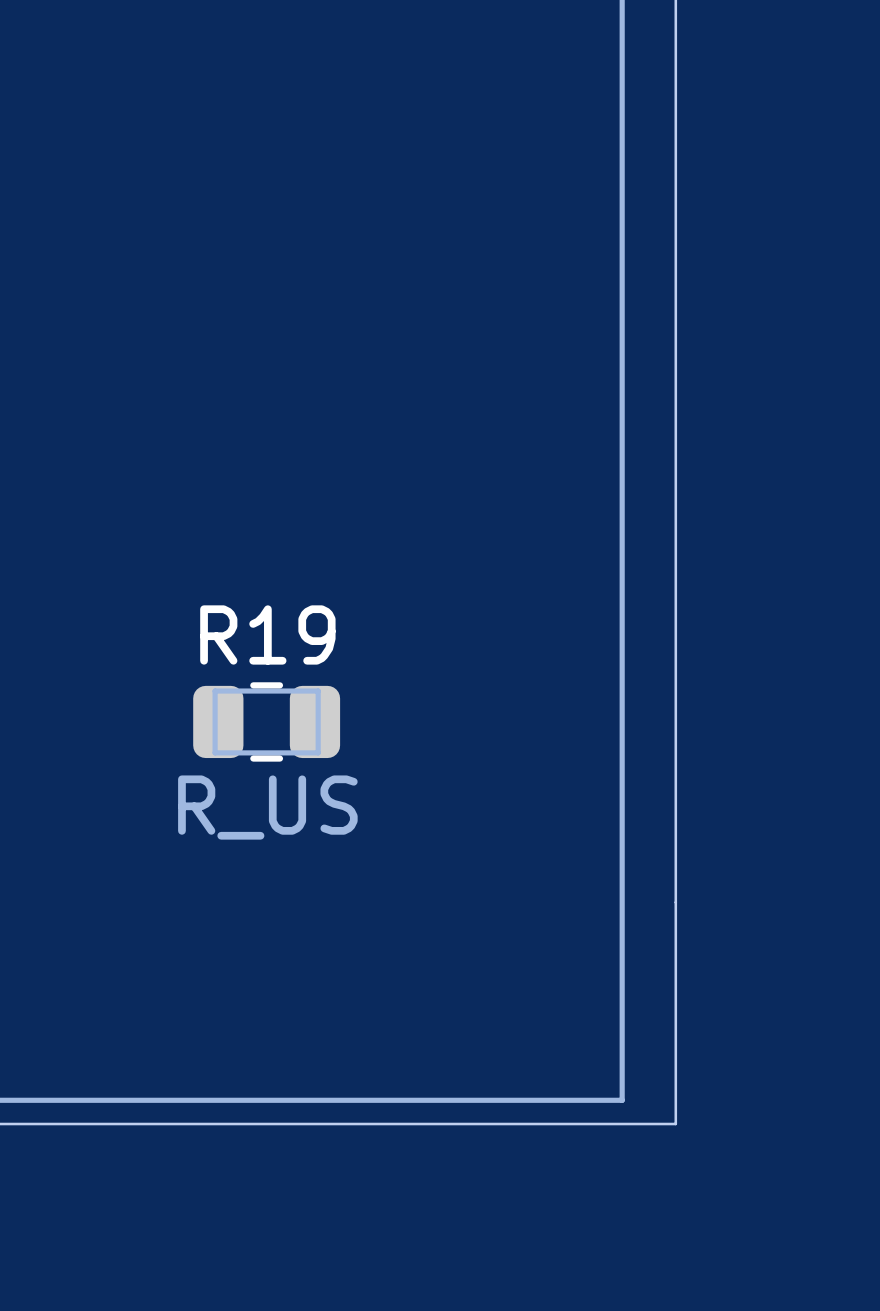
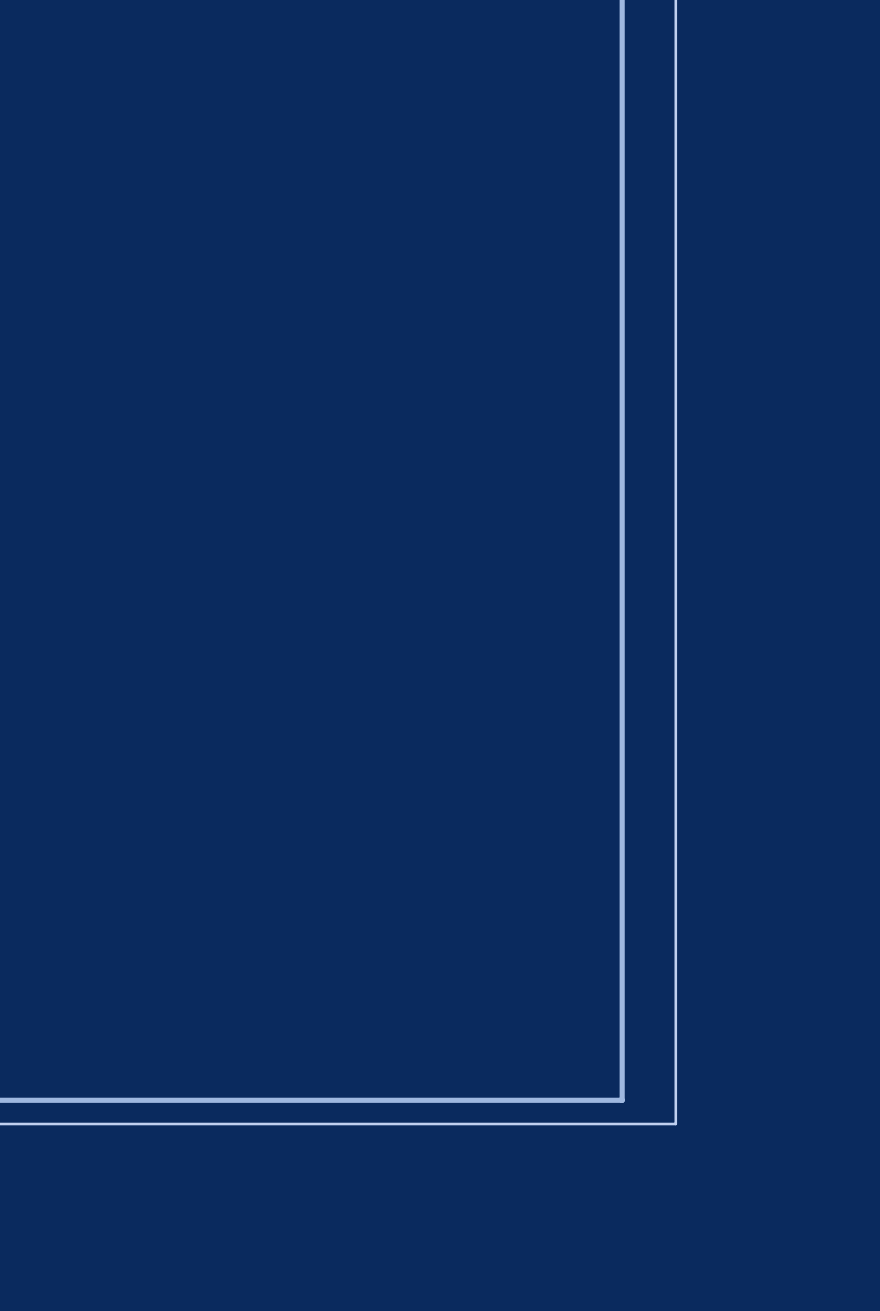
R19: R_US (266, 721) -> none

